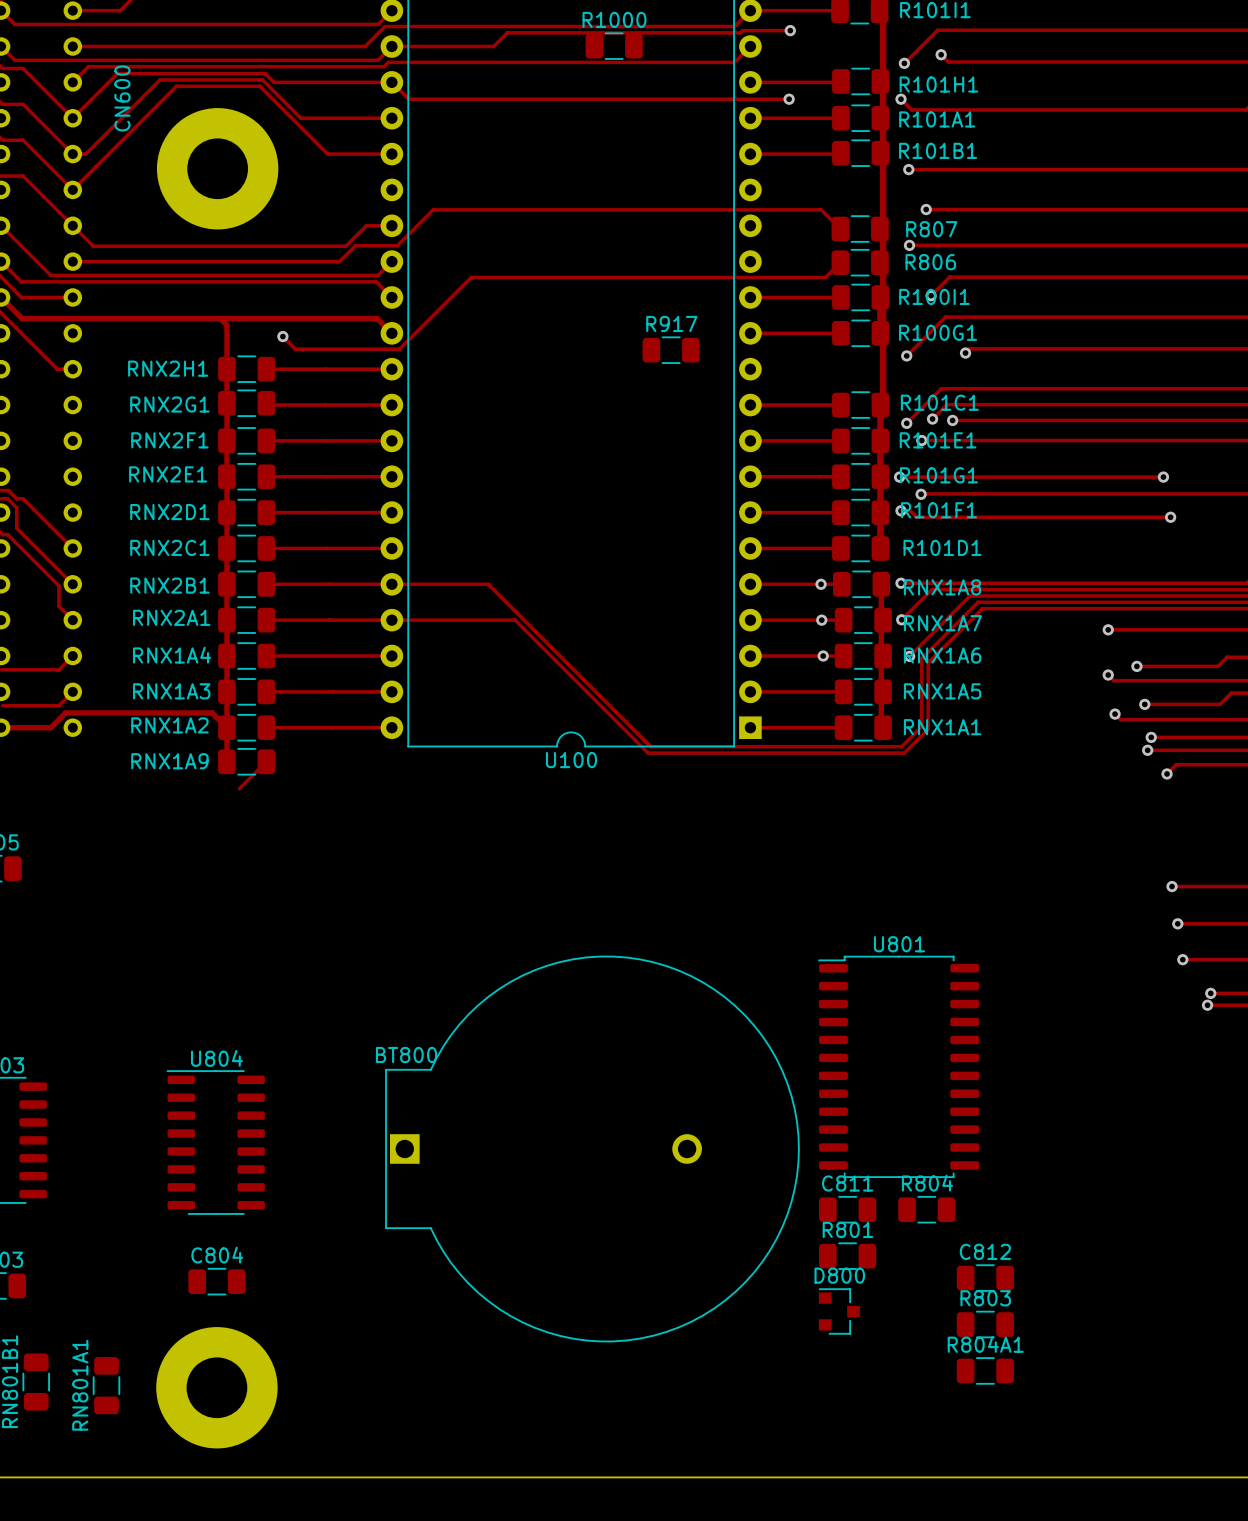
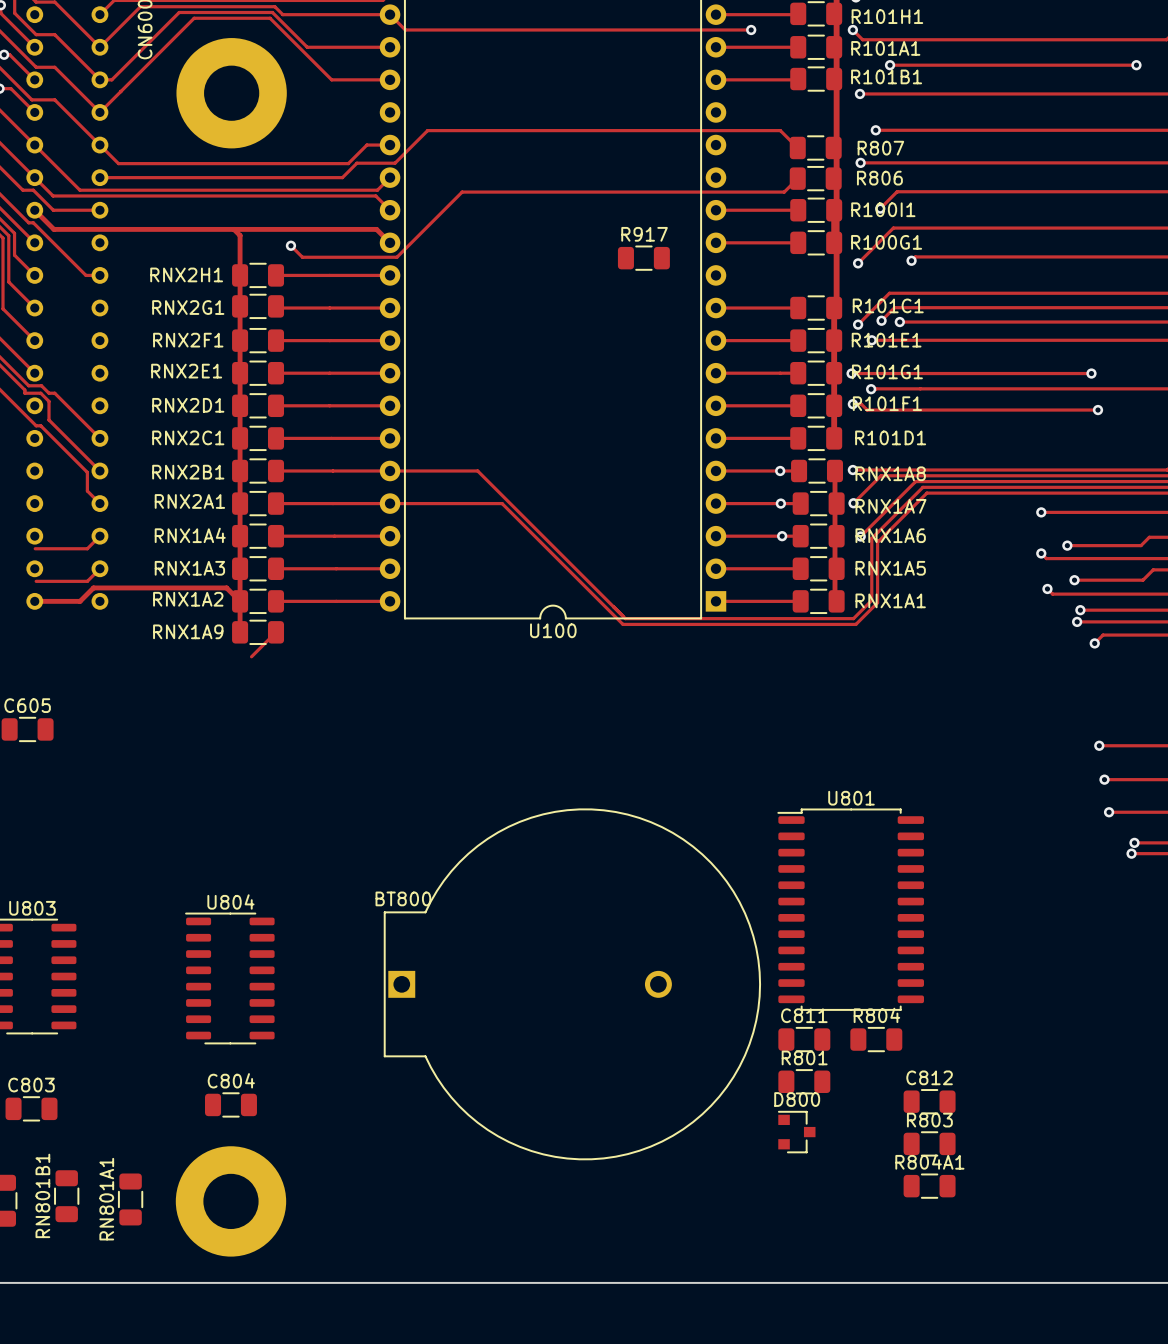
track: none -> (890, 65) (1136, 65)
via: none -> (890, 65)
via: none -> (1136, 65)

